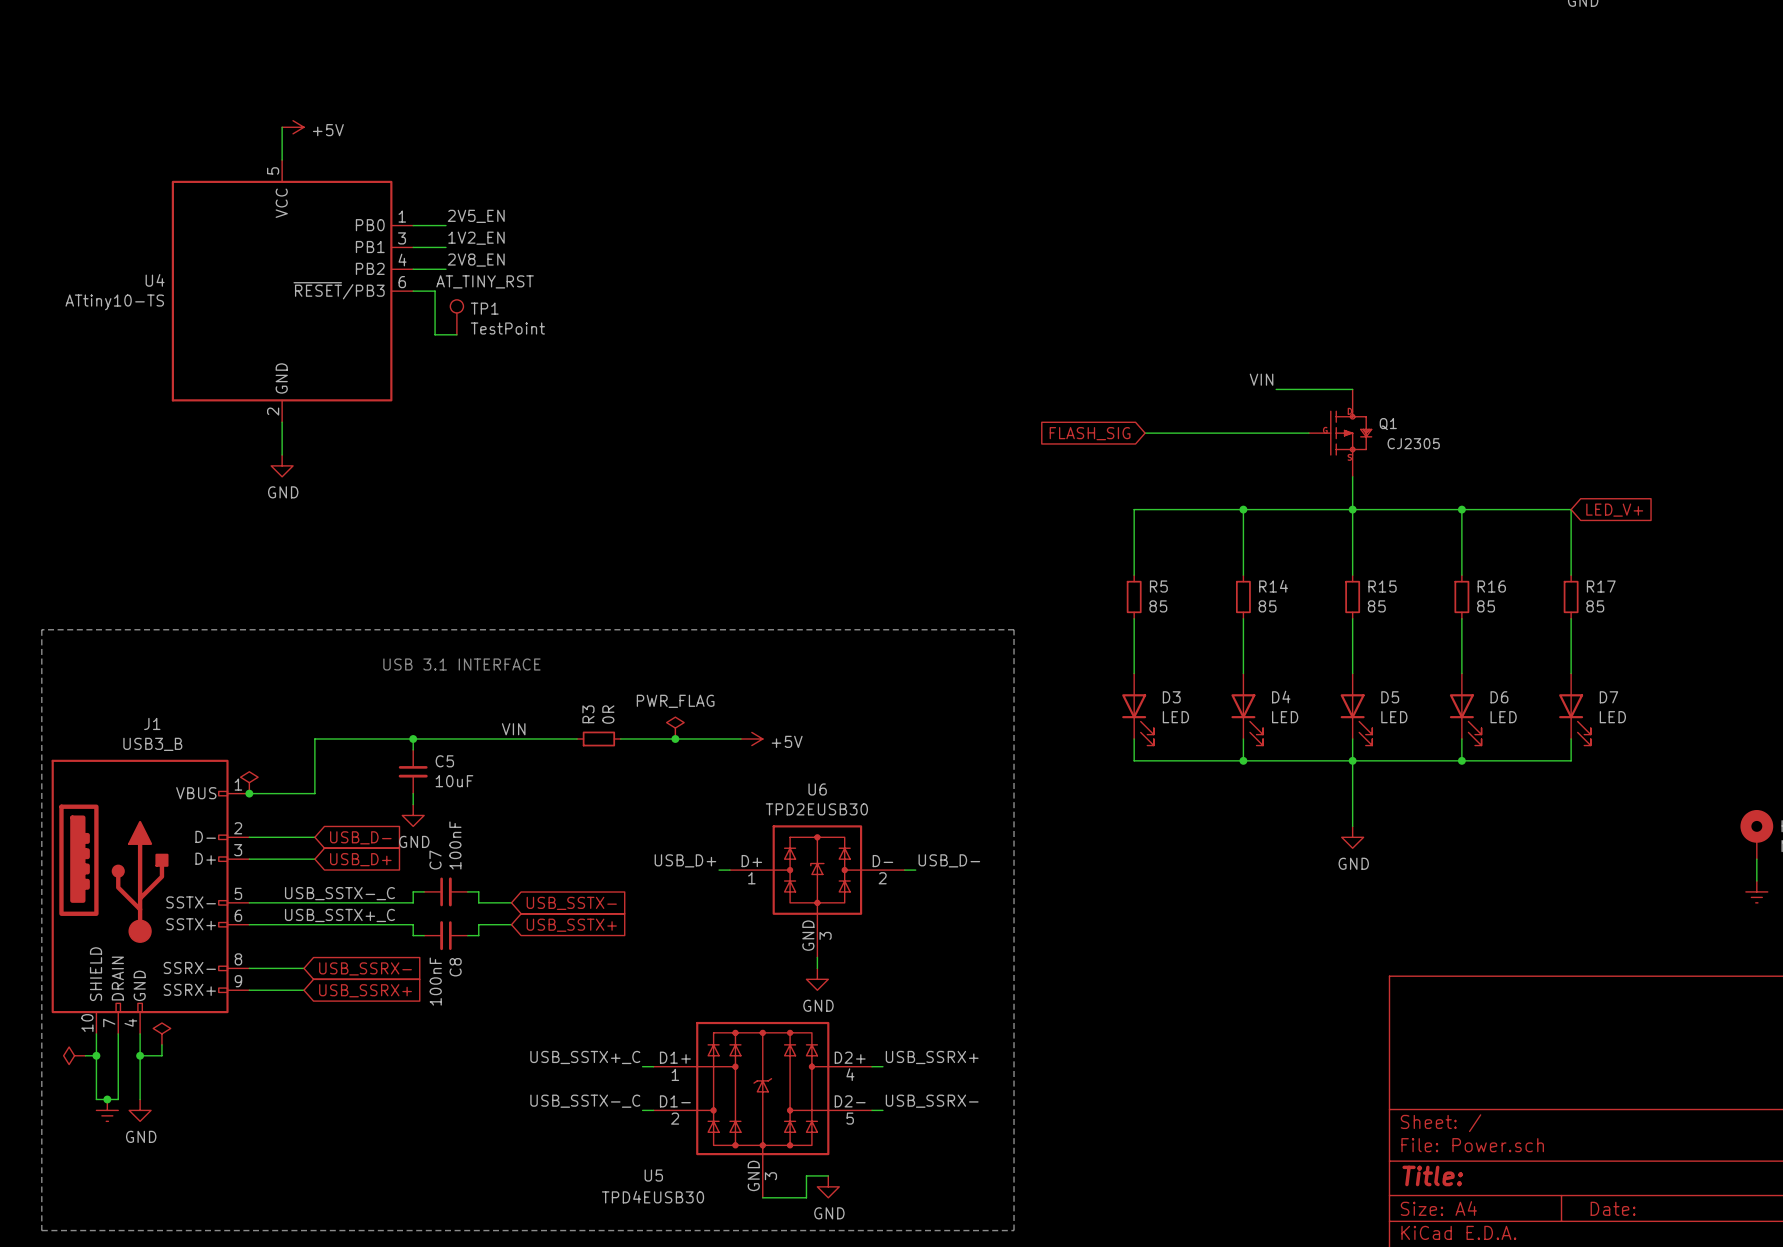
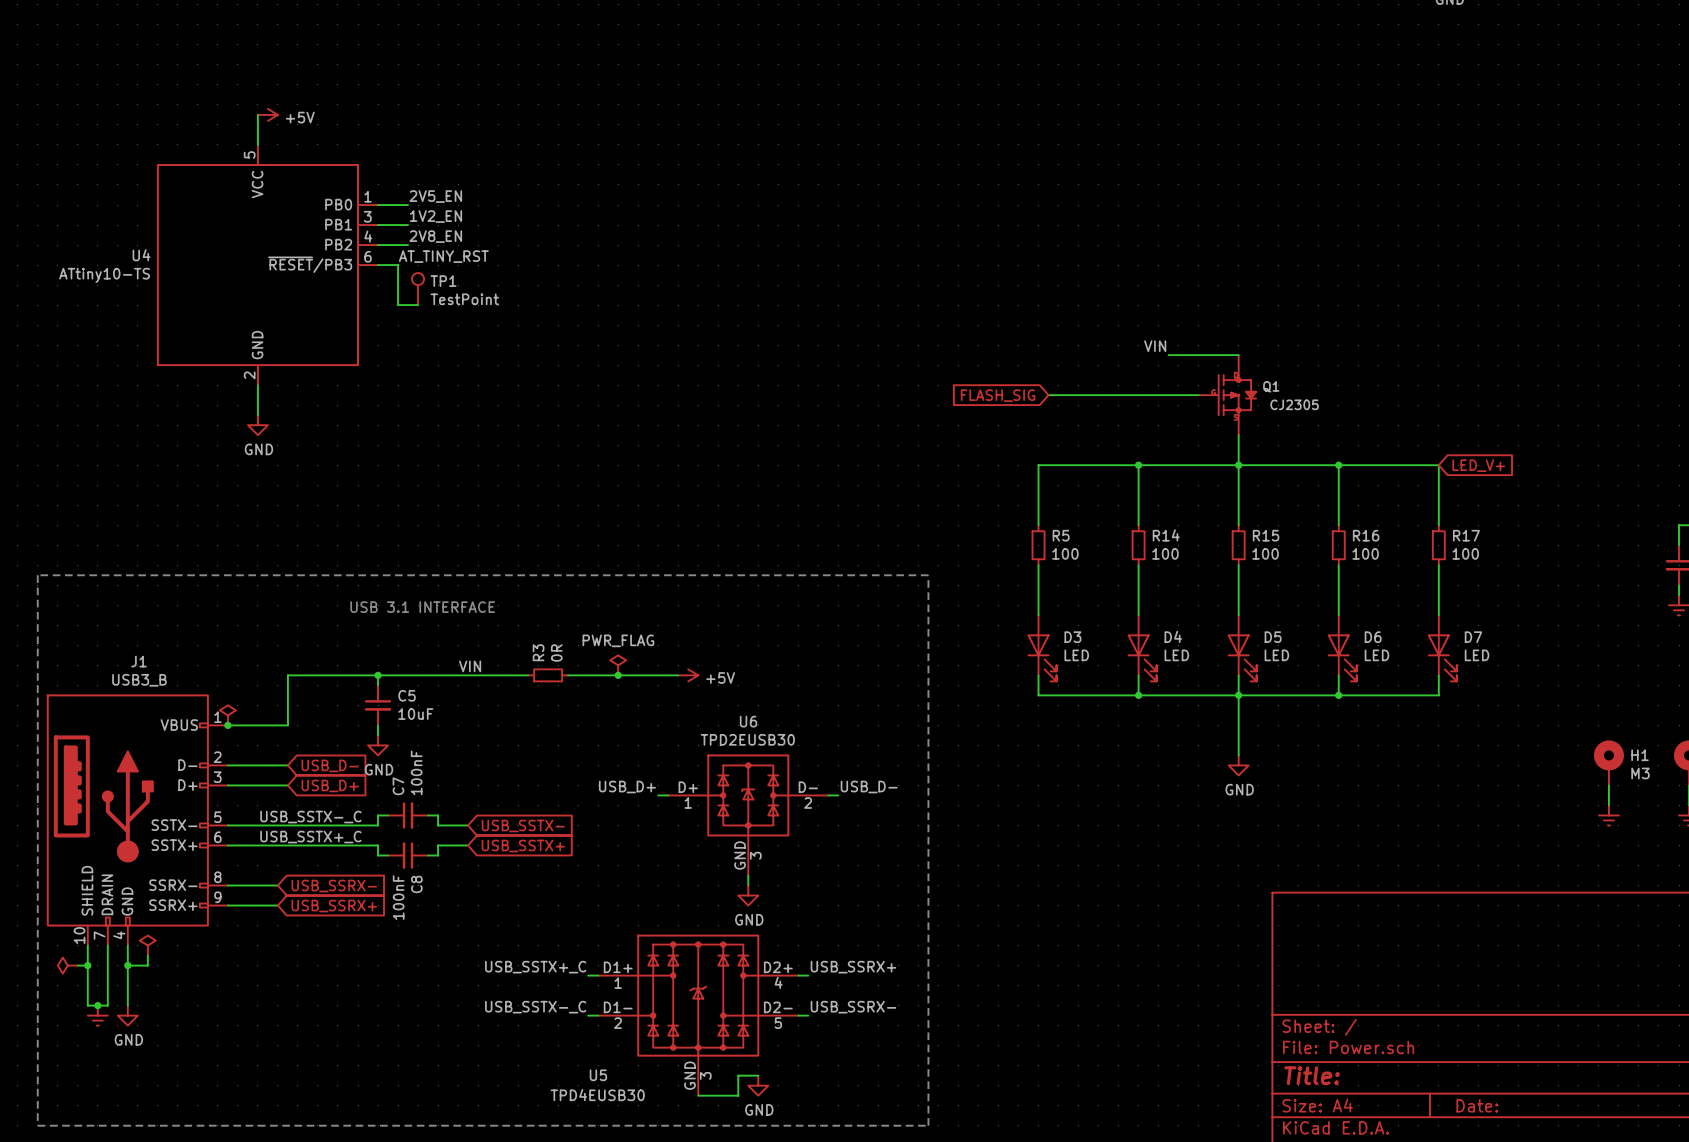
R5 value: 85 (1158, 606) -> 100 (1065, 553)
R14 value: 85 (1267, 606) -> 100 (1165, 553)
R15 value: 85 (1376, 606) -> 100 (1265, 553)
R16 value: 85 (1486, 606) -> 100 (1365, 553)
R17 value: 85 (1595, 606) -> 100 (1465, 553)

